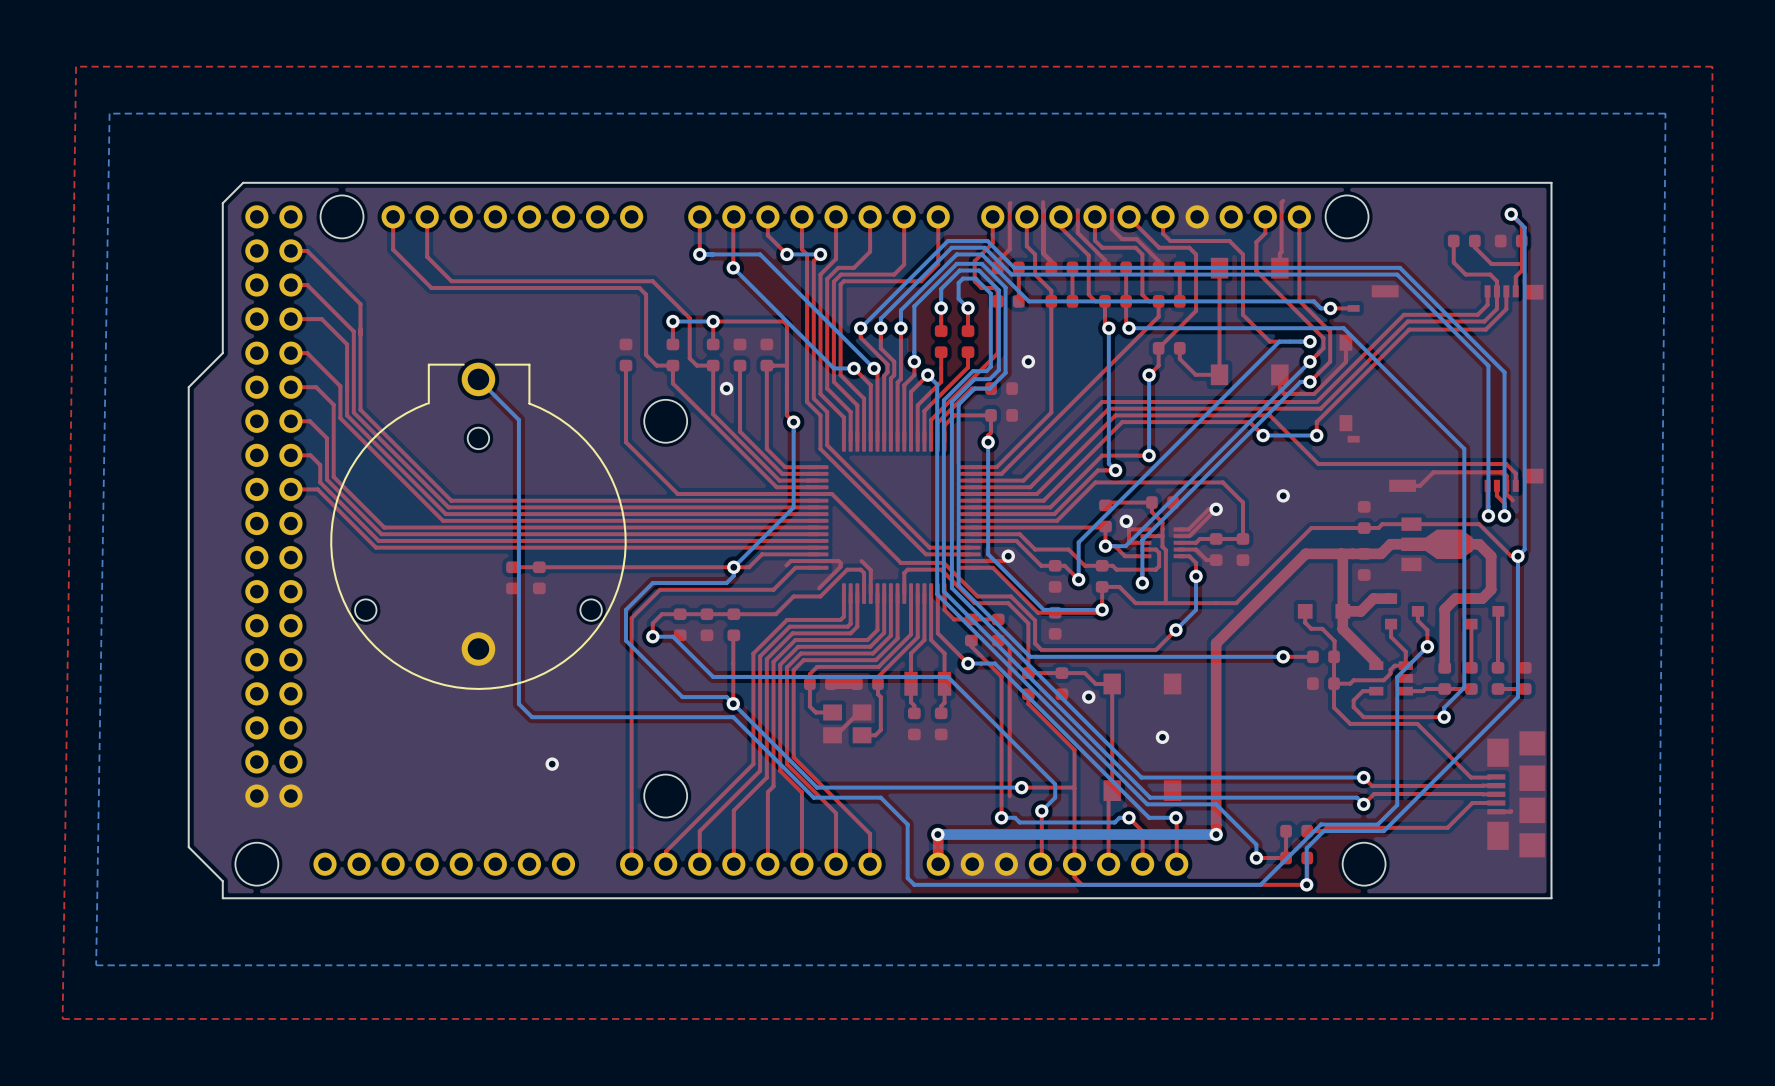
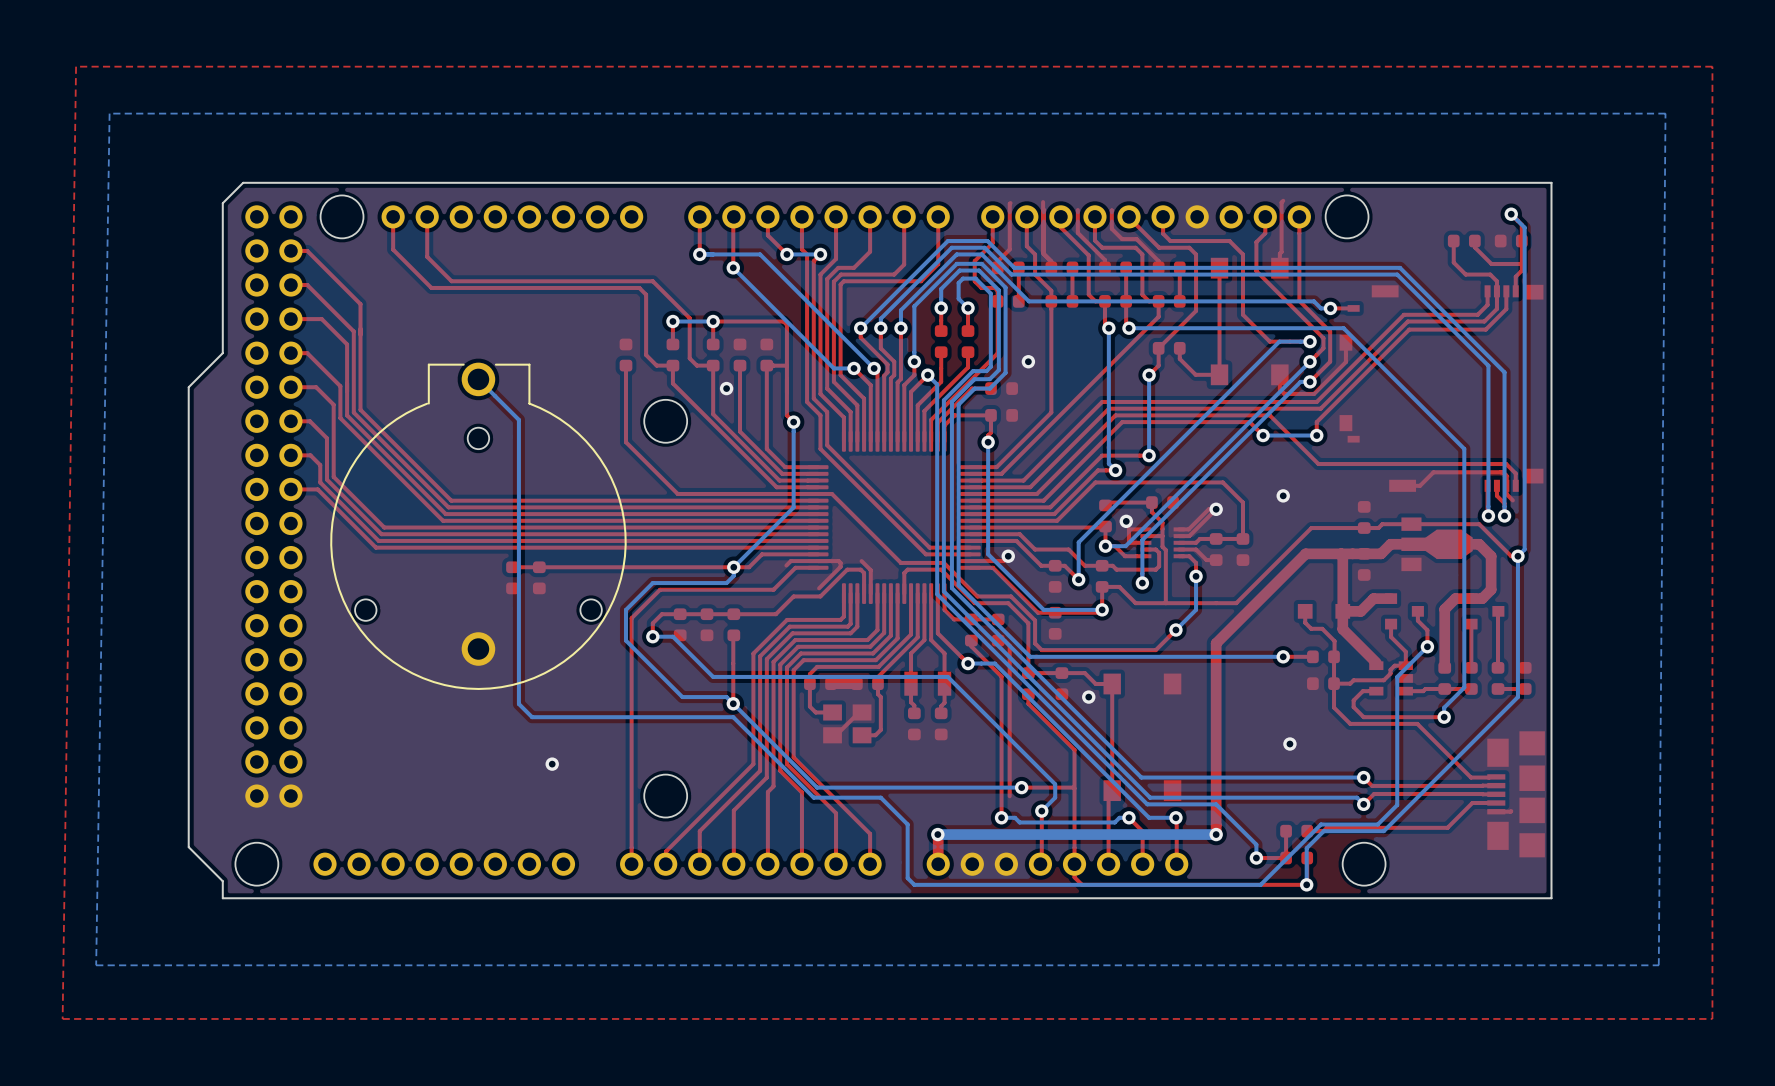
via: (1162, 737) -> none
via: none -> (1289, 744)

